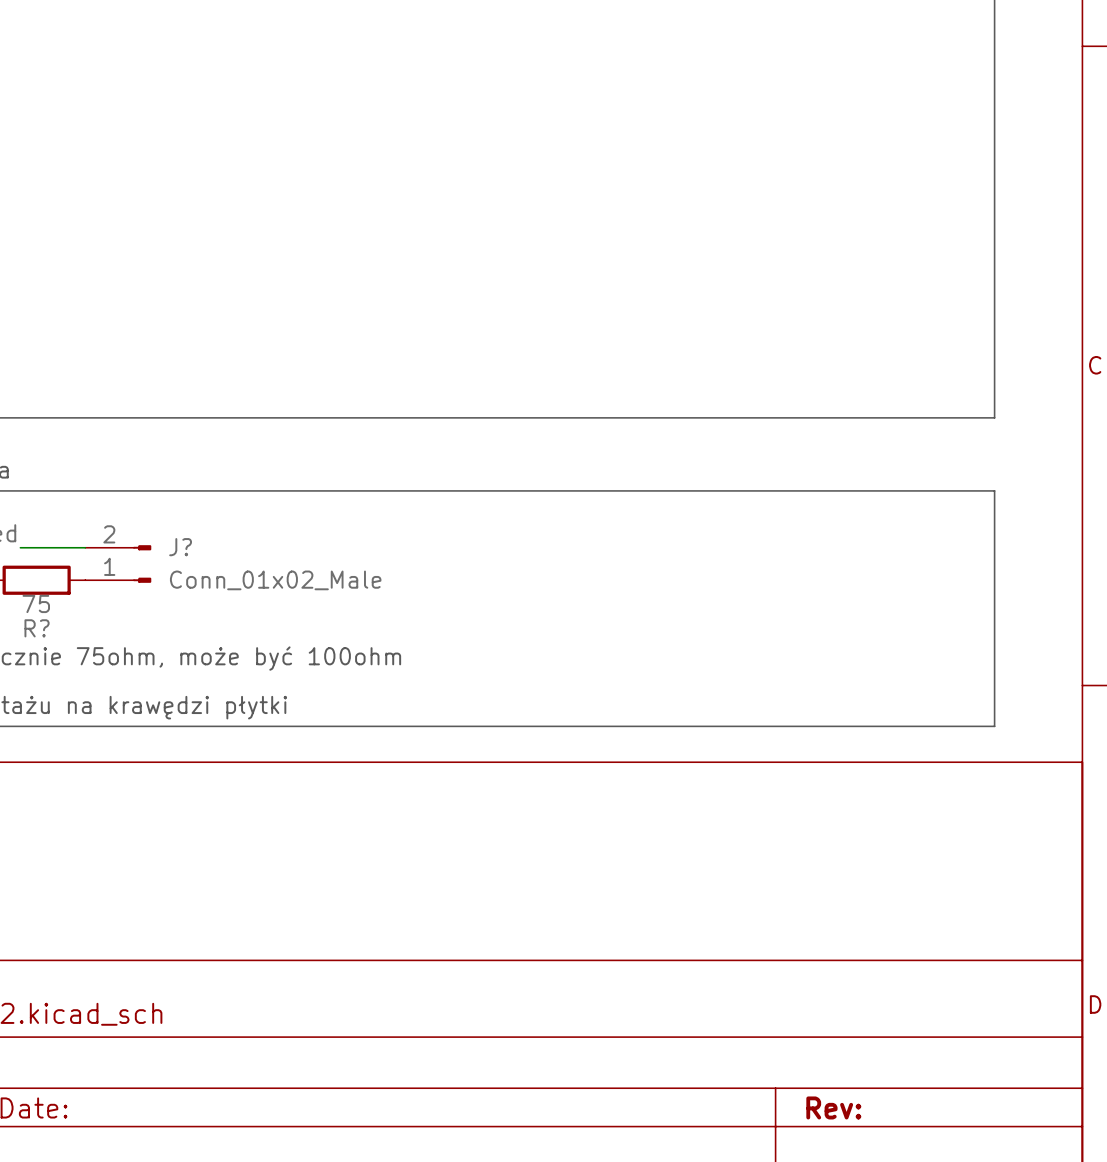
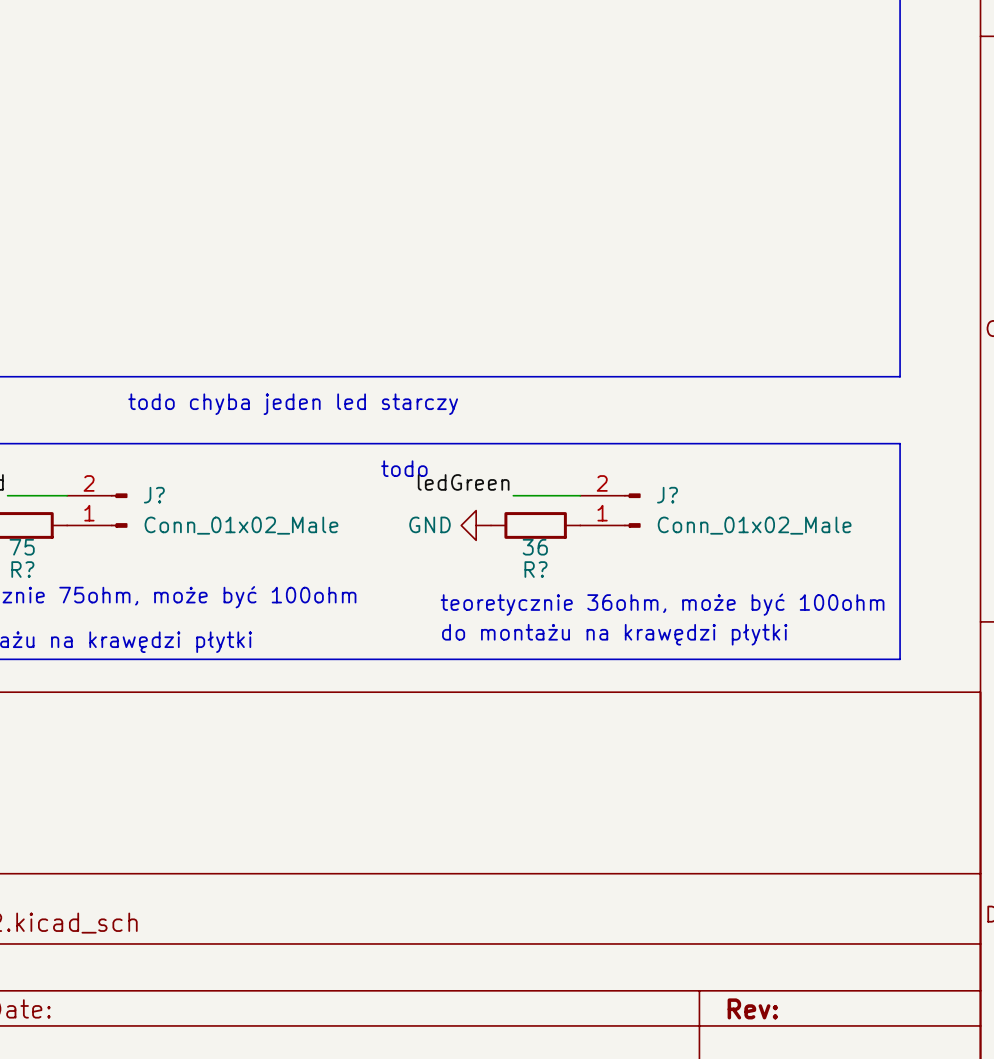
text: none -> todo chyba jeden led starczy (293, 404)
text: none -> todo (404, 468)
label: none -> ledGreen (463, 482)
wire: none -> (513, 495) (580, 495)
J?: none -> Conn_01x02_Male (610, 510)
power symbol: none -> GND (476, 525)
R?: none -> 36 (535, 525)
text: none -> teoretycznie 36ohm, może być 100ohm (662, 604)
text: none -> do montażu na krawędzi płytki (614, 634)

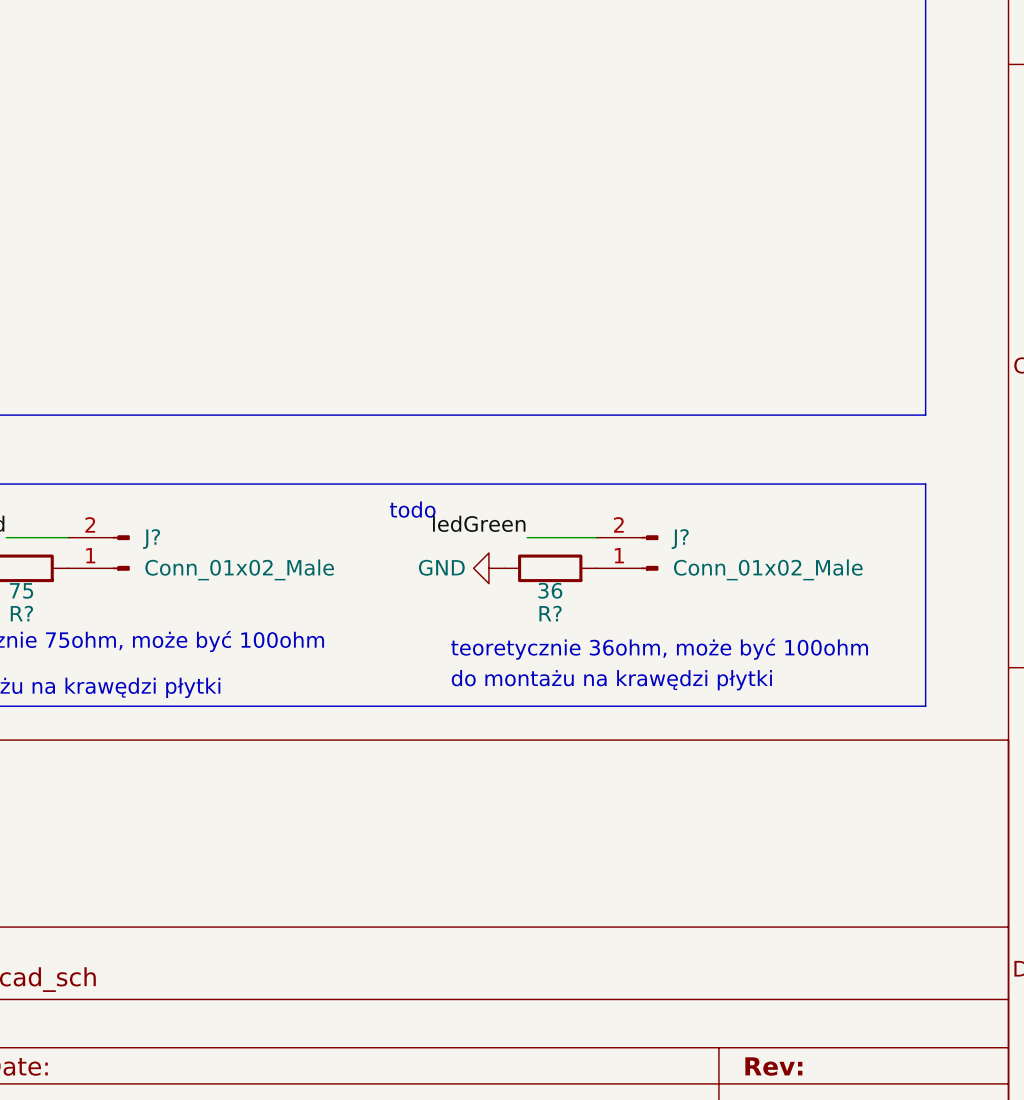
text: todo chyba jeden led starczy (293, 404) -> none

